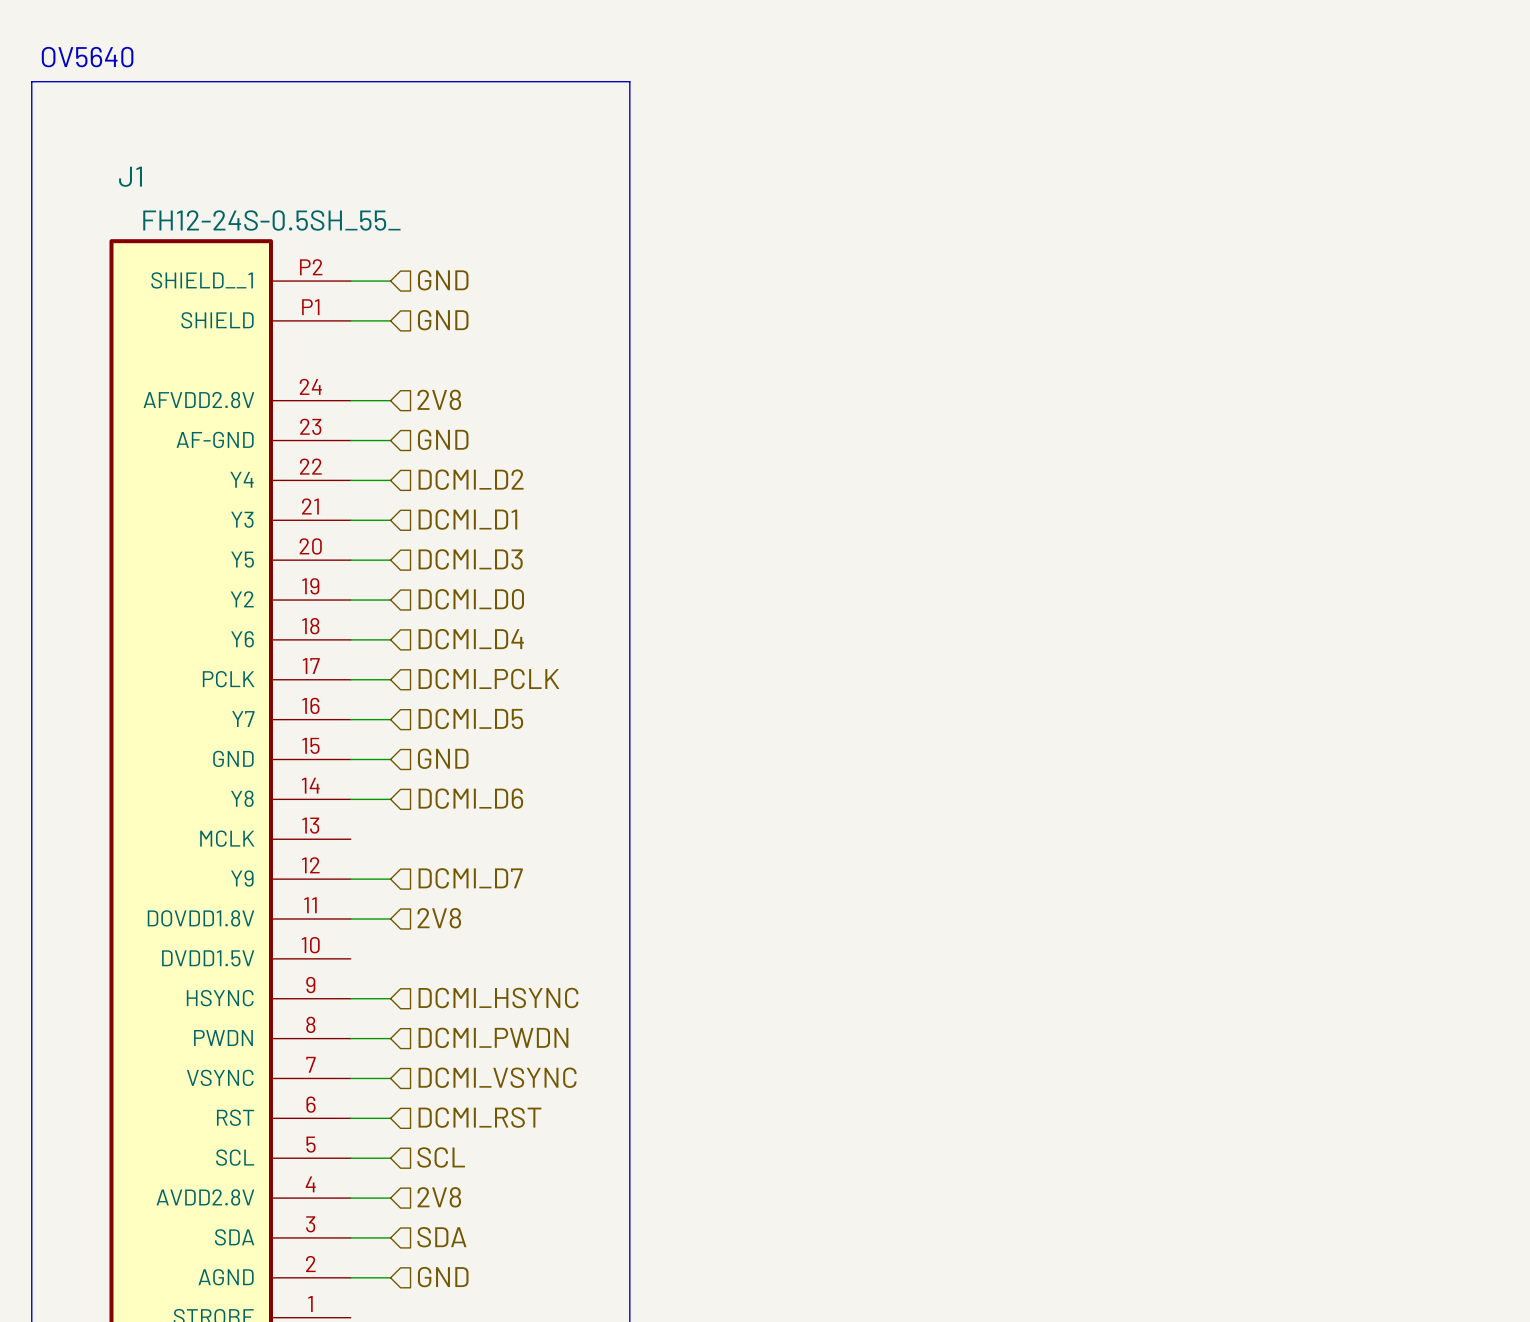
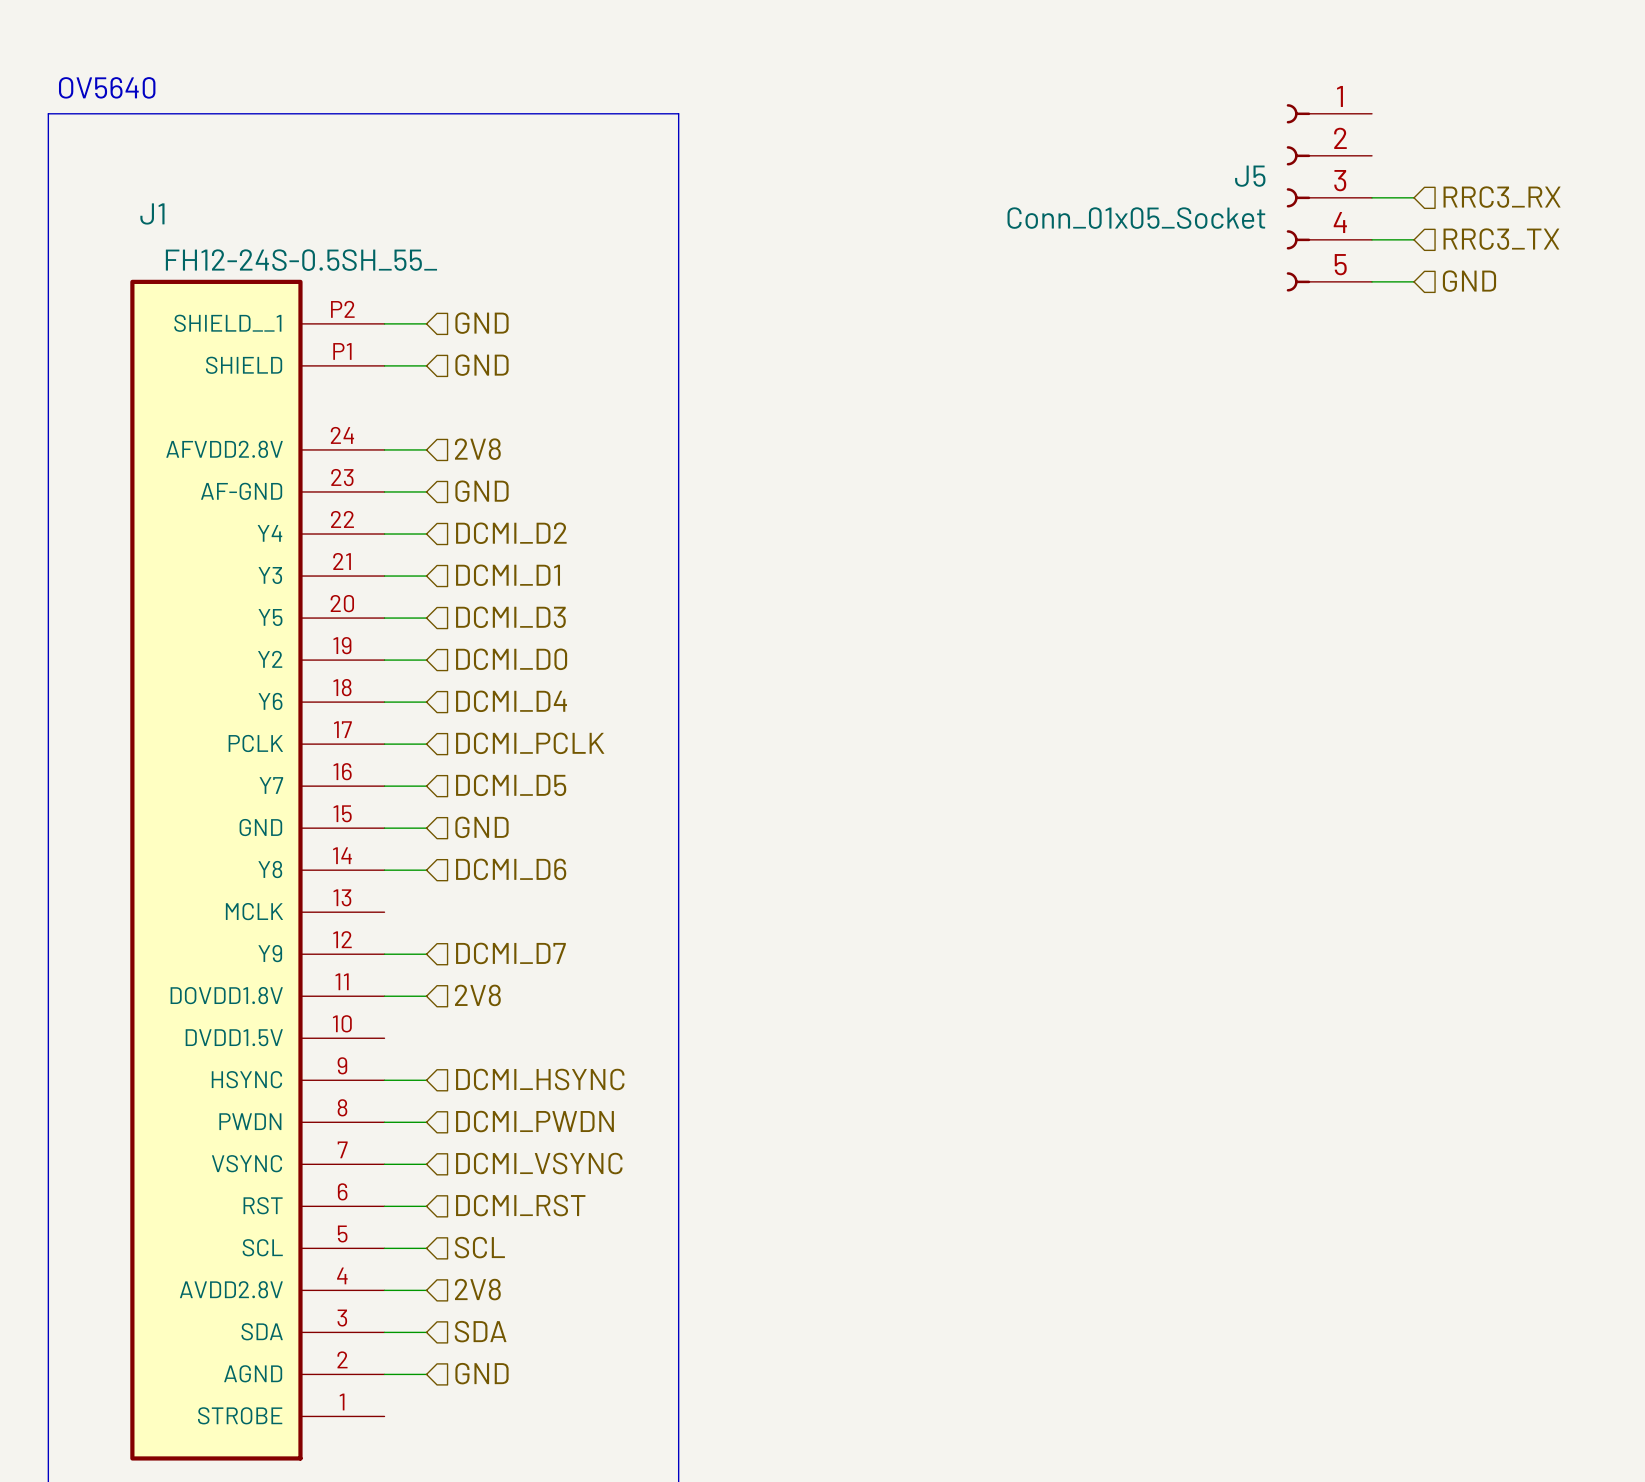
hierarchical label: none -> RRC3_RX (1502, 197)
J5: none -> Conn_01x05_Socket (1329, 197)
wire: none -> (1372, 197) (1414, 197)
hierarchical label: none -> RRC3_TX (1501, 239)
wire: none -> (1372, 239) (1414, 239)
hierarchical label: none -> GND (1469, 281)
wire: none -> (1372, 281) (1414, 281)

